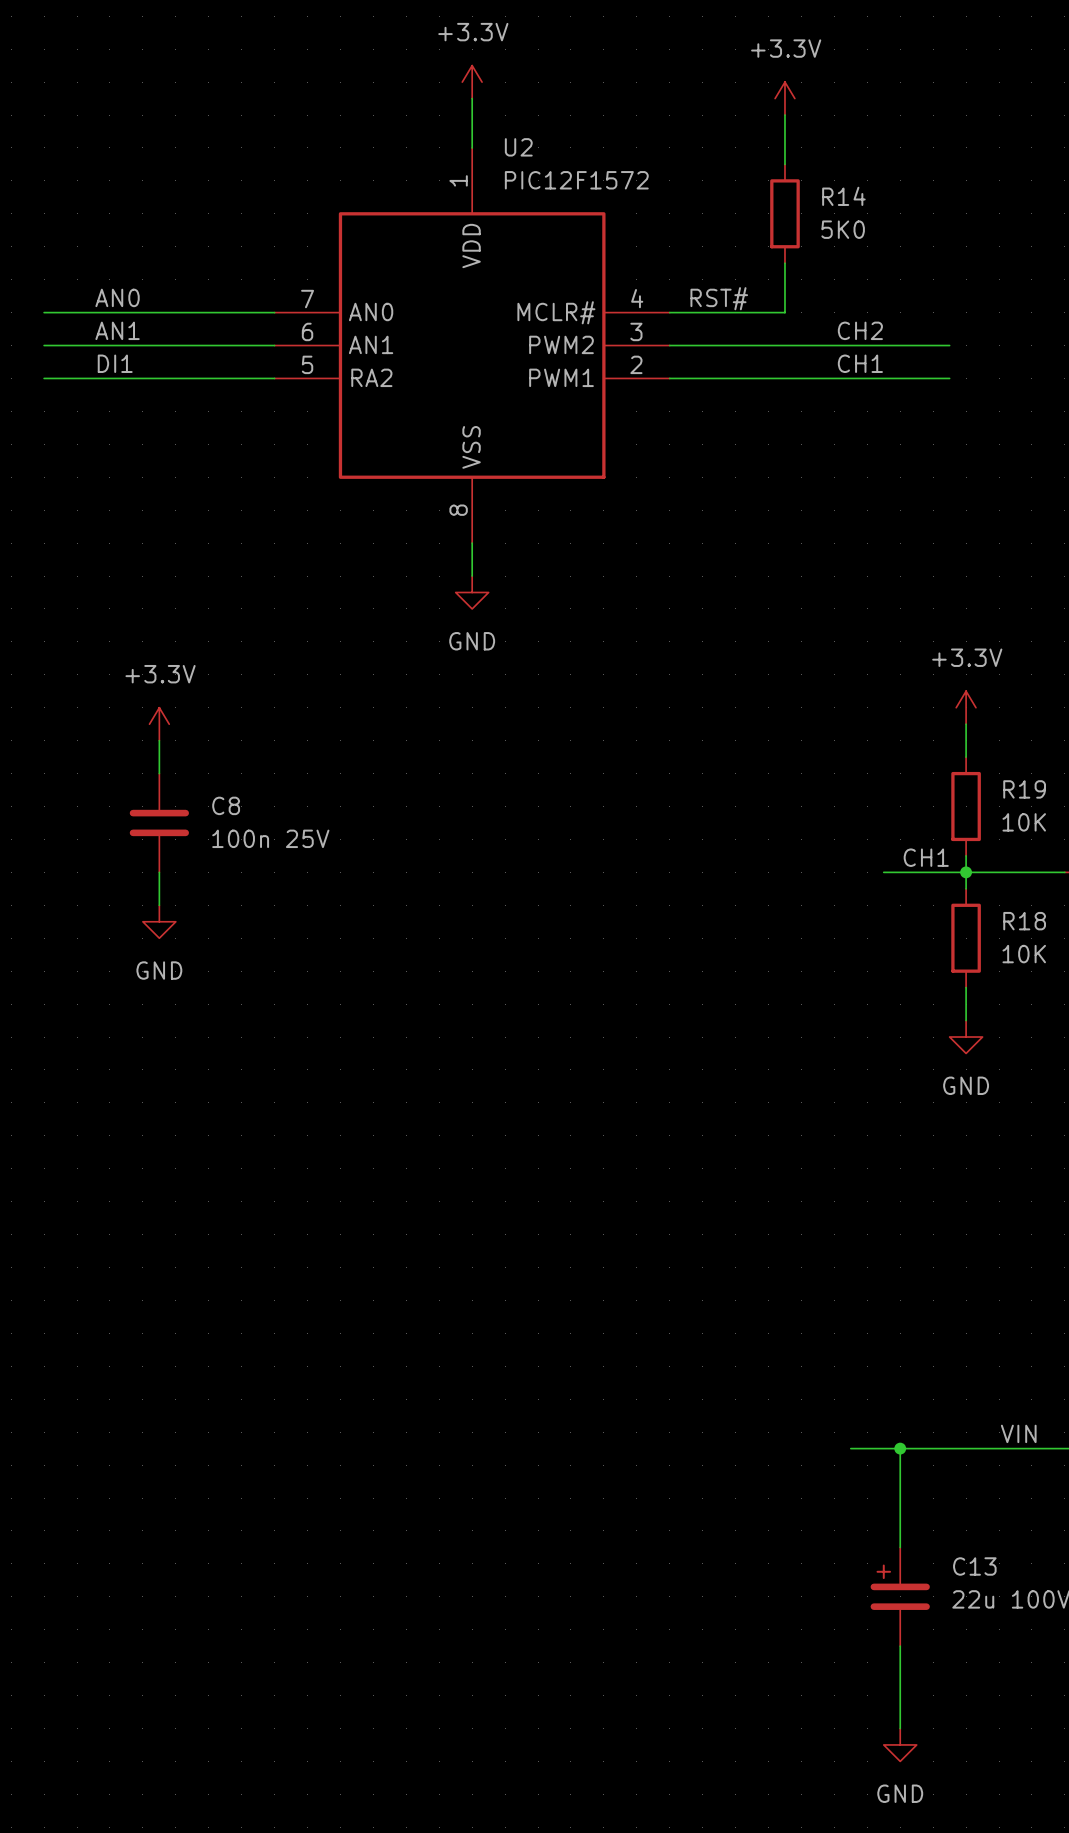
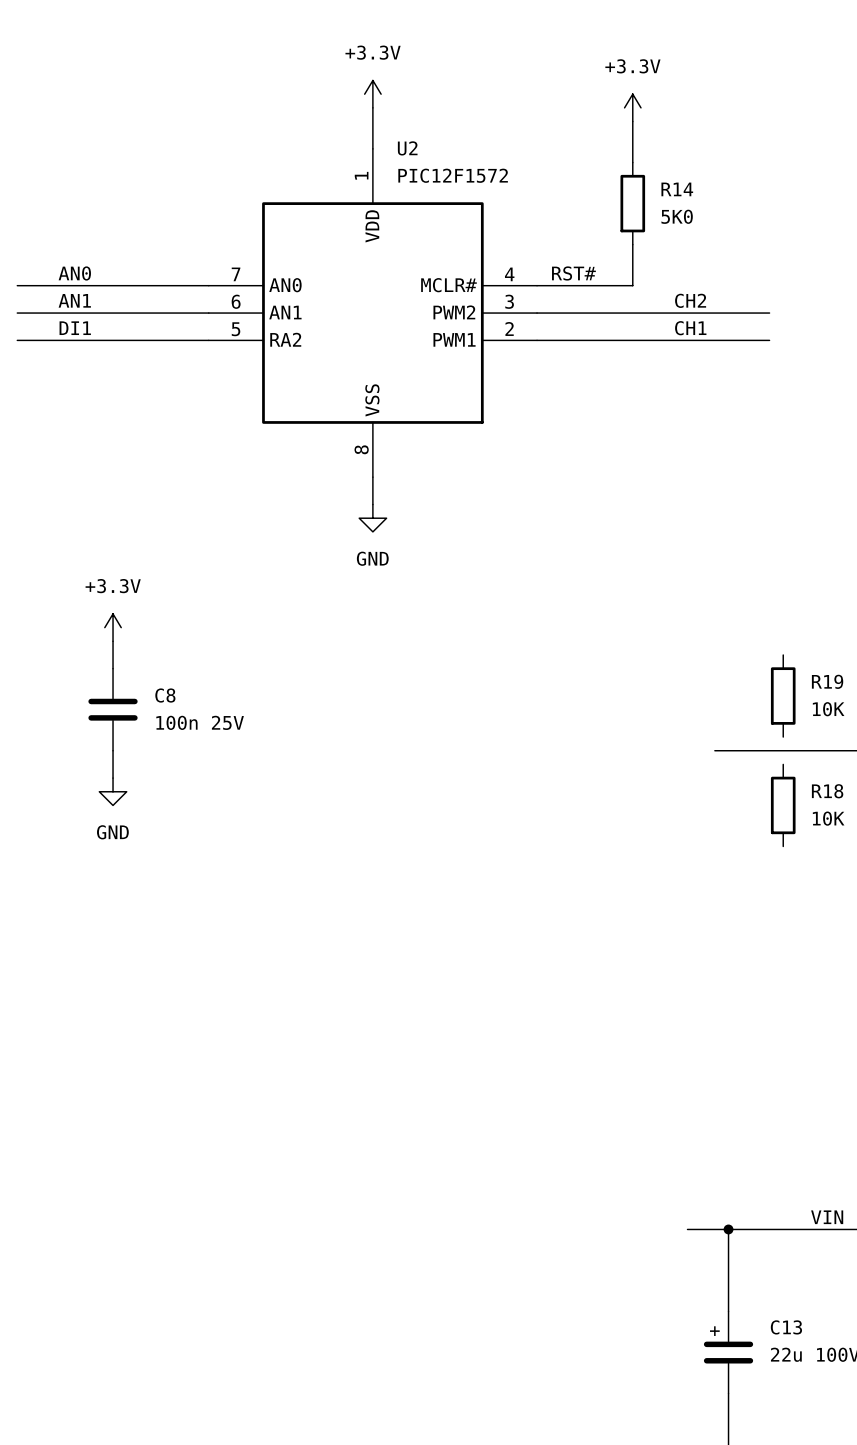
power symbol: +3.3V (966, 707) -> none
wire: (966, 724) (966, 757) -> none
wire: (966, 855) (966, 888) -> none
label: CH1 (926, 857) -> none
junction: (966, 872) -> none
wire: (966, 987) (966, 1020) -> none
power symbol: GND (966, 1037) -> none

